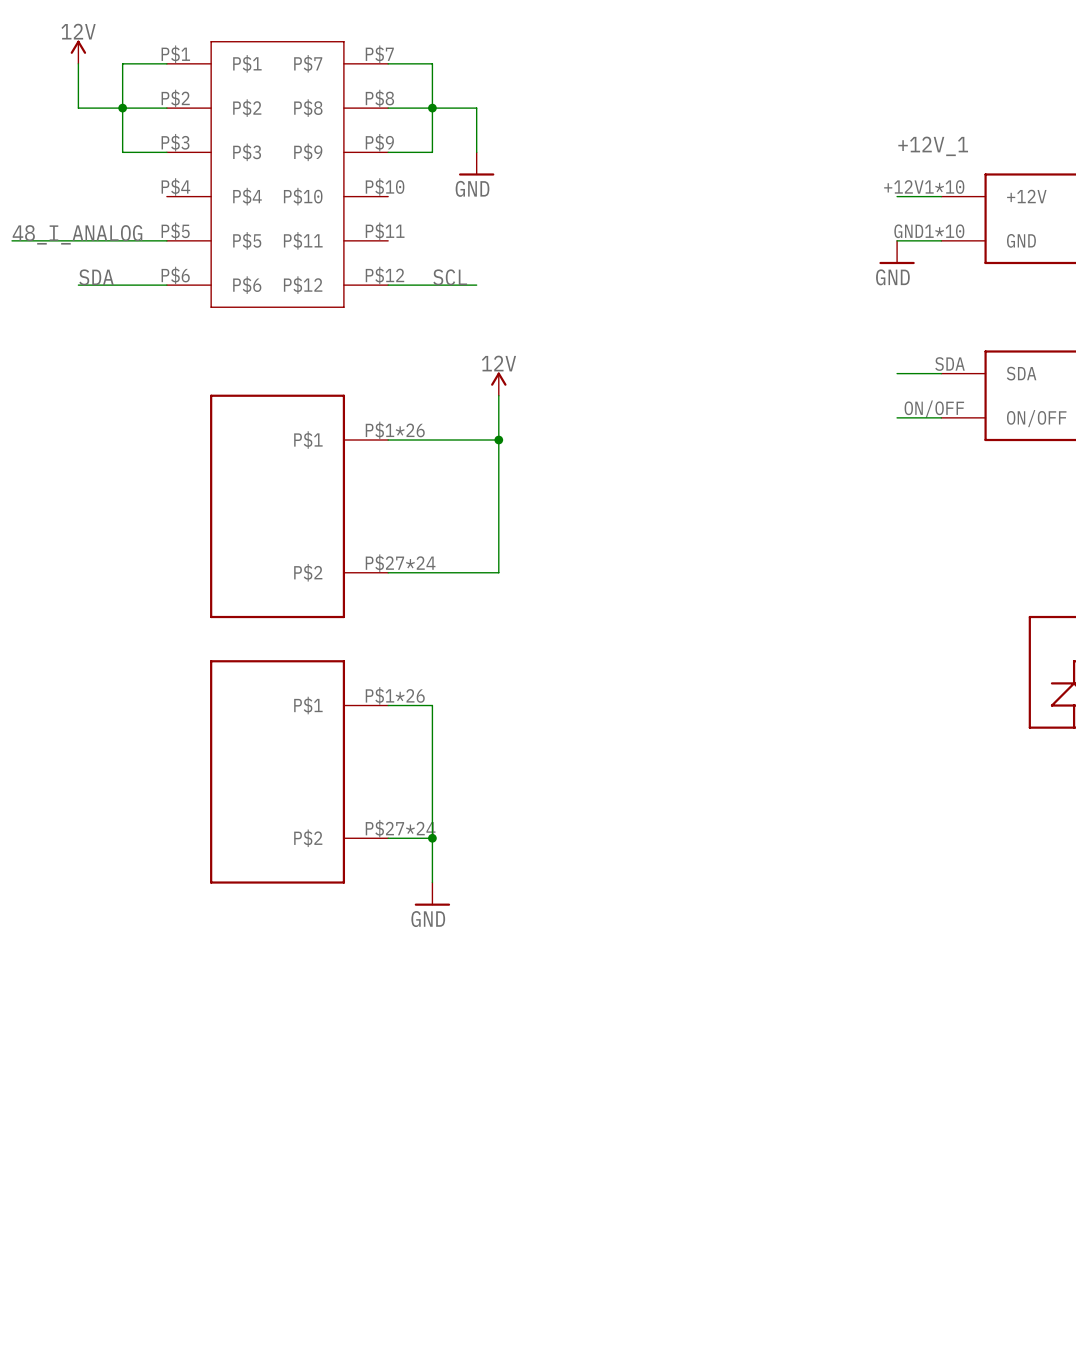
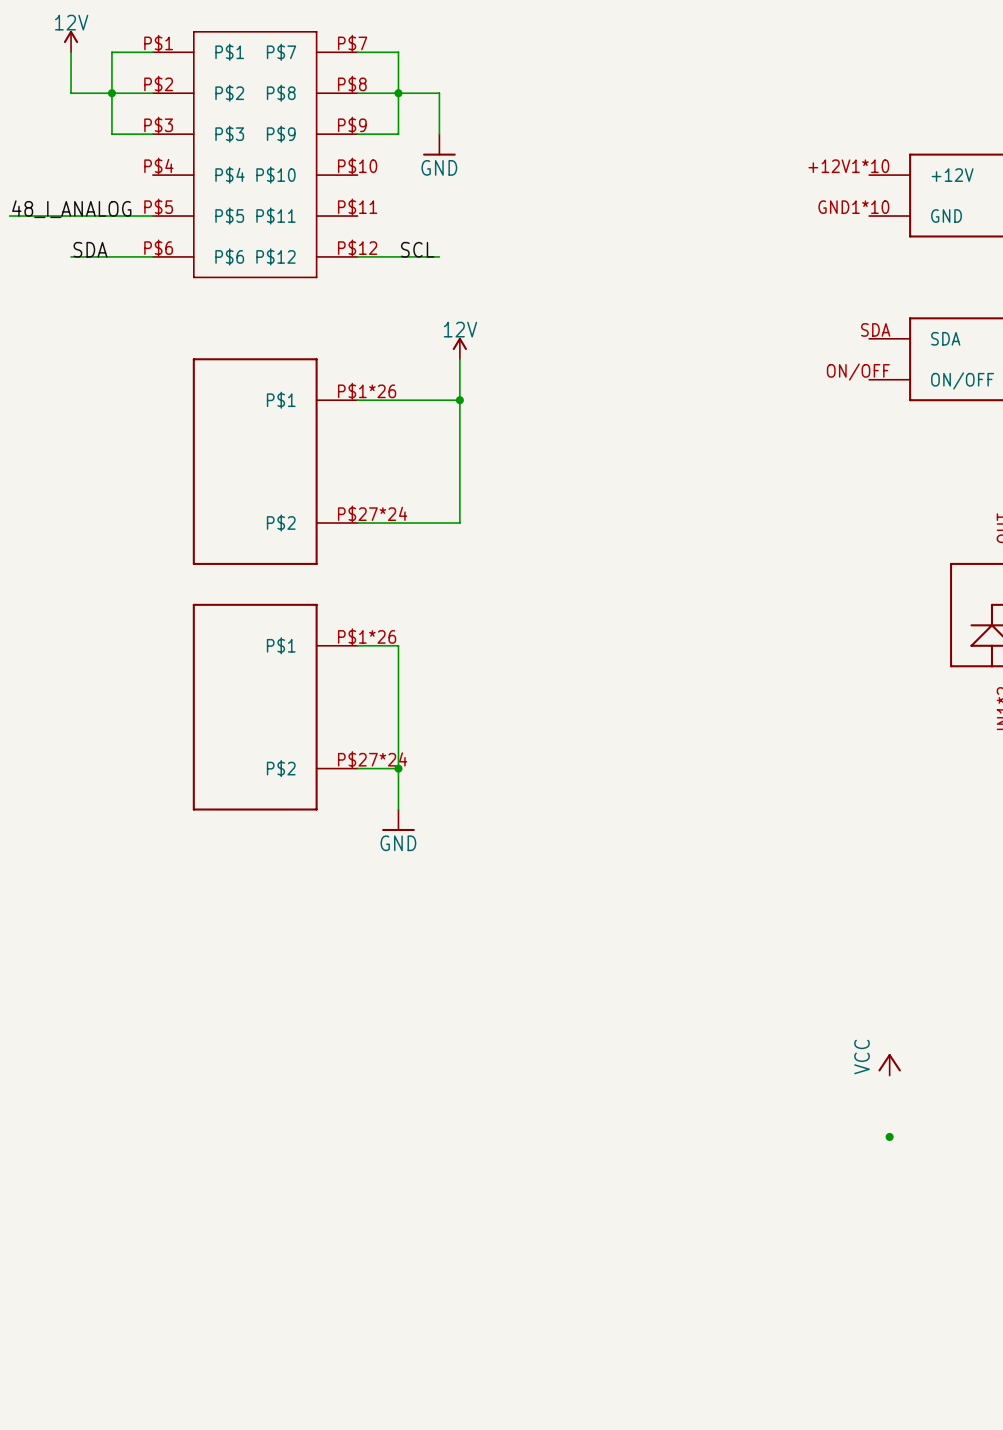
label: +12V_1 (933, 146) -> none
wire: (897, 196) (941, 196) -> none
wire: (897, 240) (941, 240) -> none
power symbol: GND (897, 252) -> none
wire: (897, 373) (941, 373) -> none
wire: (897, 417) (941, 417) -> none
power symbol: none -> VCC (889, 1064)
junction: none -> (889, 1136)

